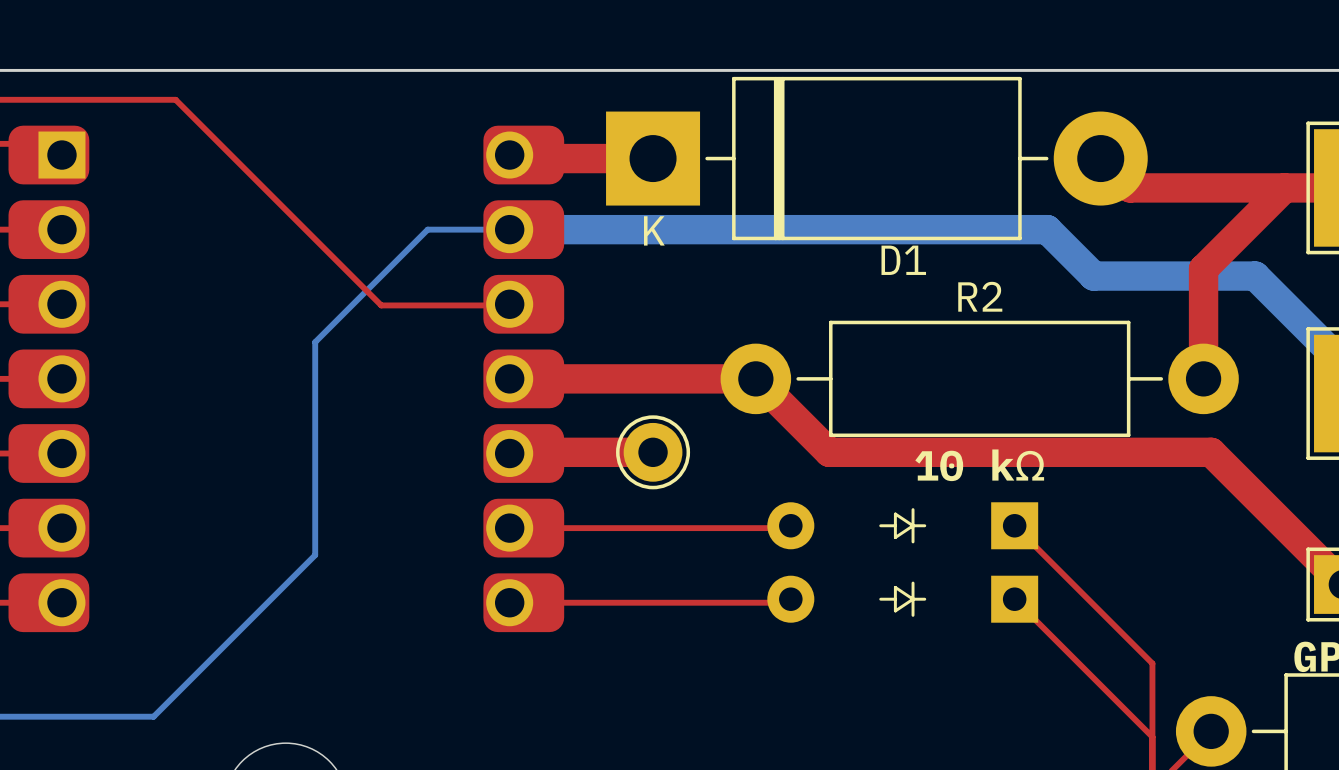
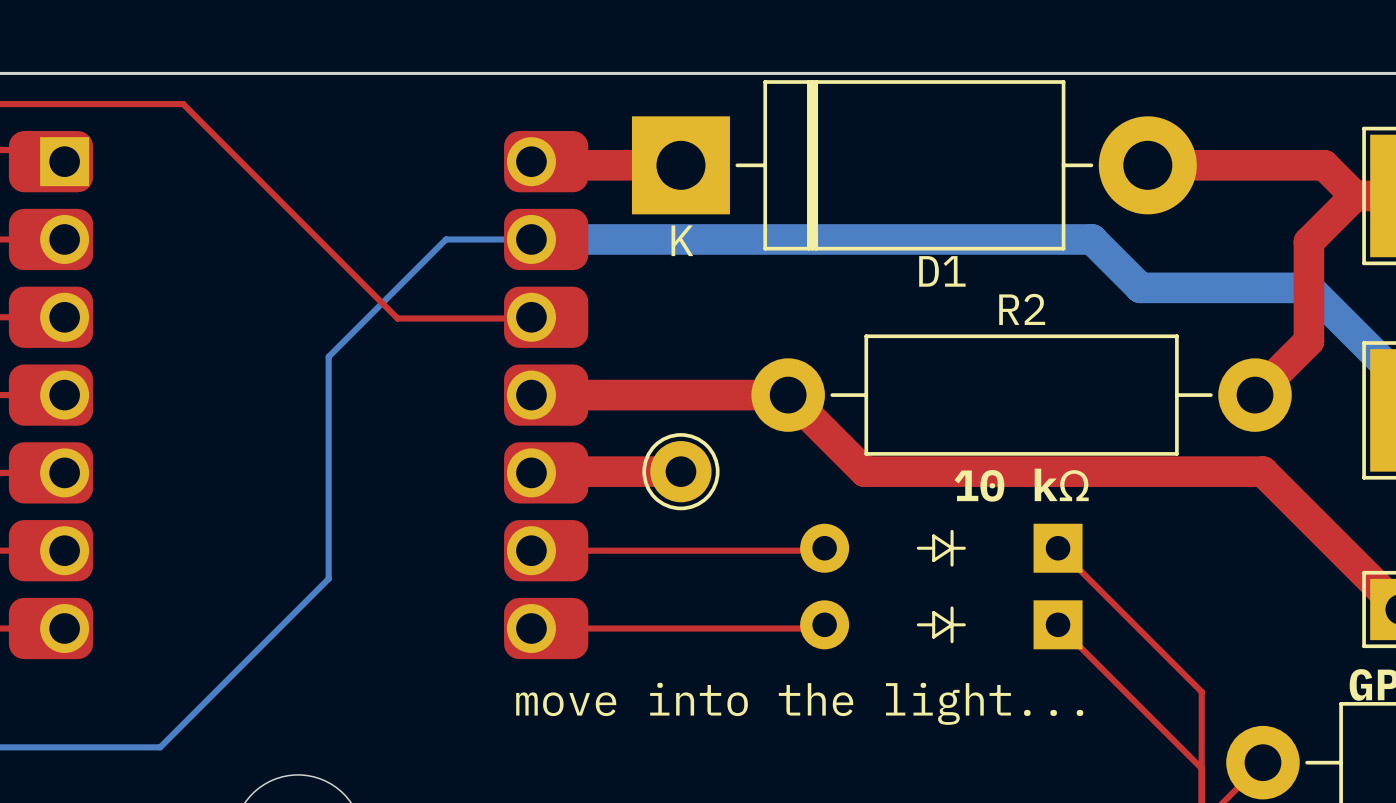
top track: (1100, 158) (1130, 187) (1299, 187) -> none
top track: (1284, 187) (1203, 269) (1203, 378) -> (1147, 165) (1324, 165) (1354, 195) (1308, 241) (1308, 341) (1255, 395)
text: none -> move into the light... (799, 703)

